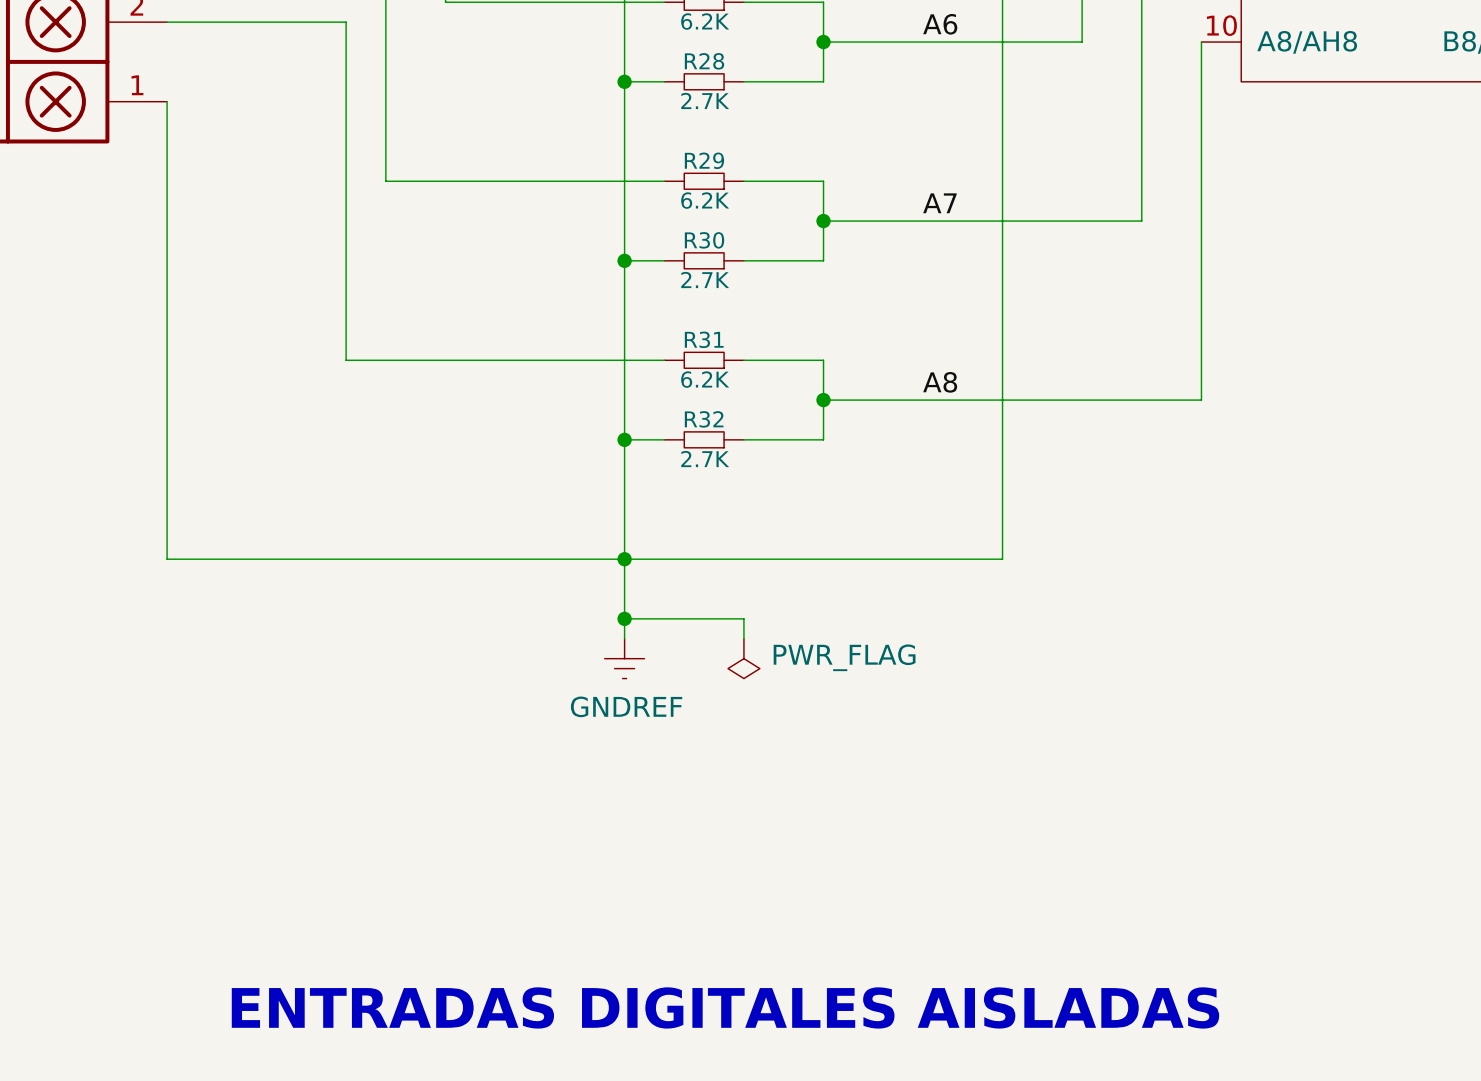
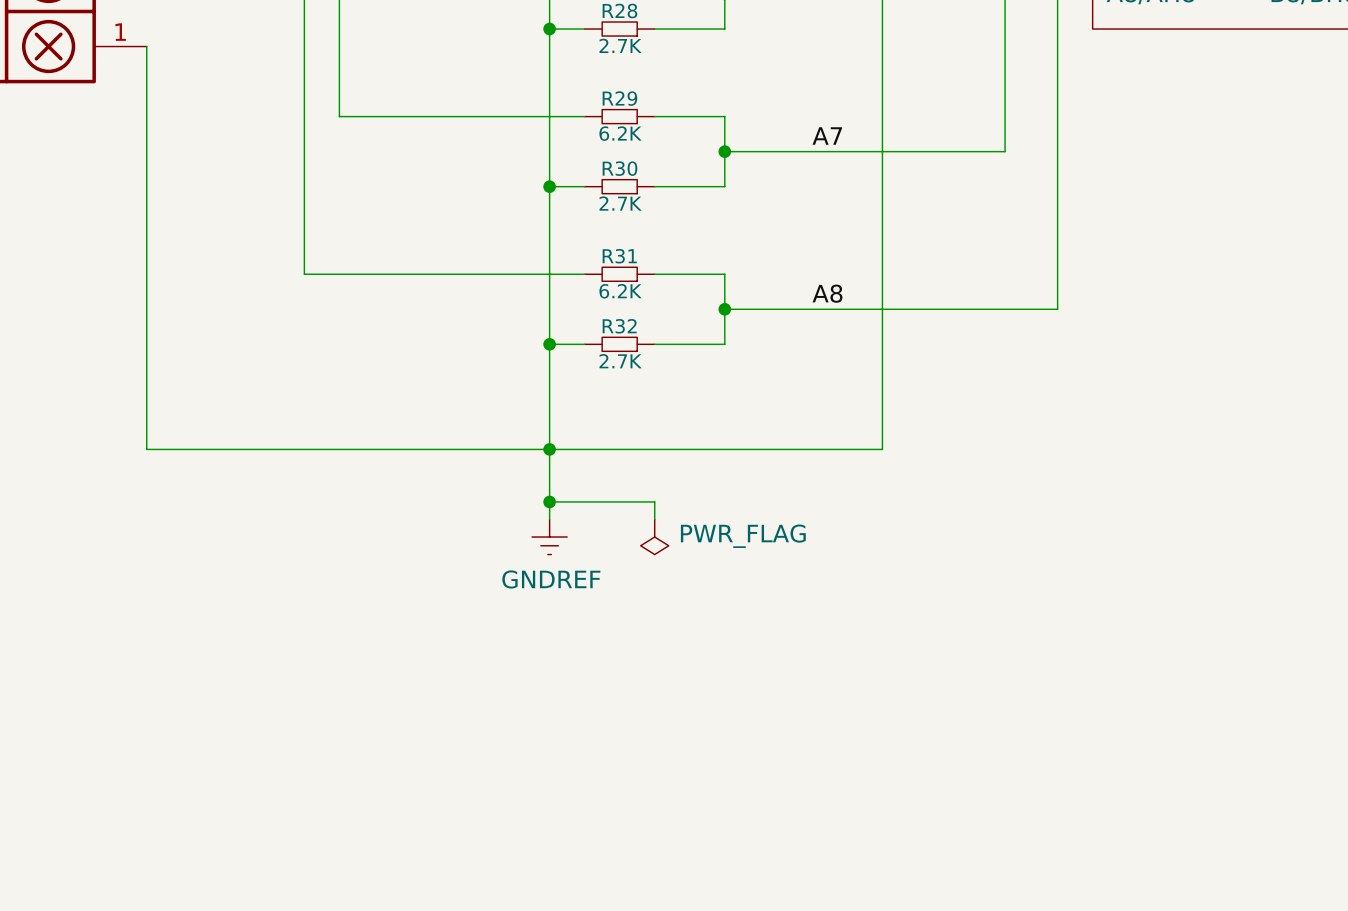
text: ENTRADAS DIGITALES AISLADAS (725, 1007) -> none

